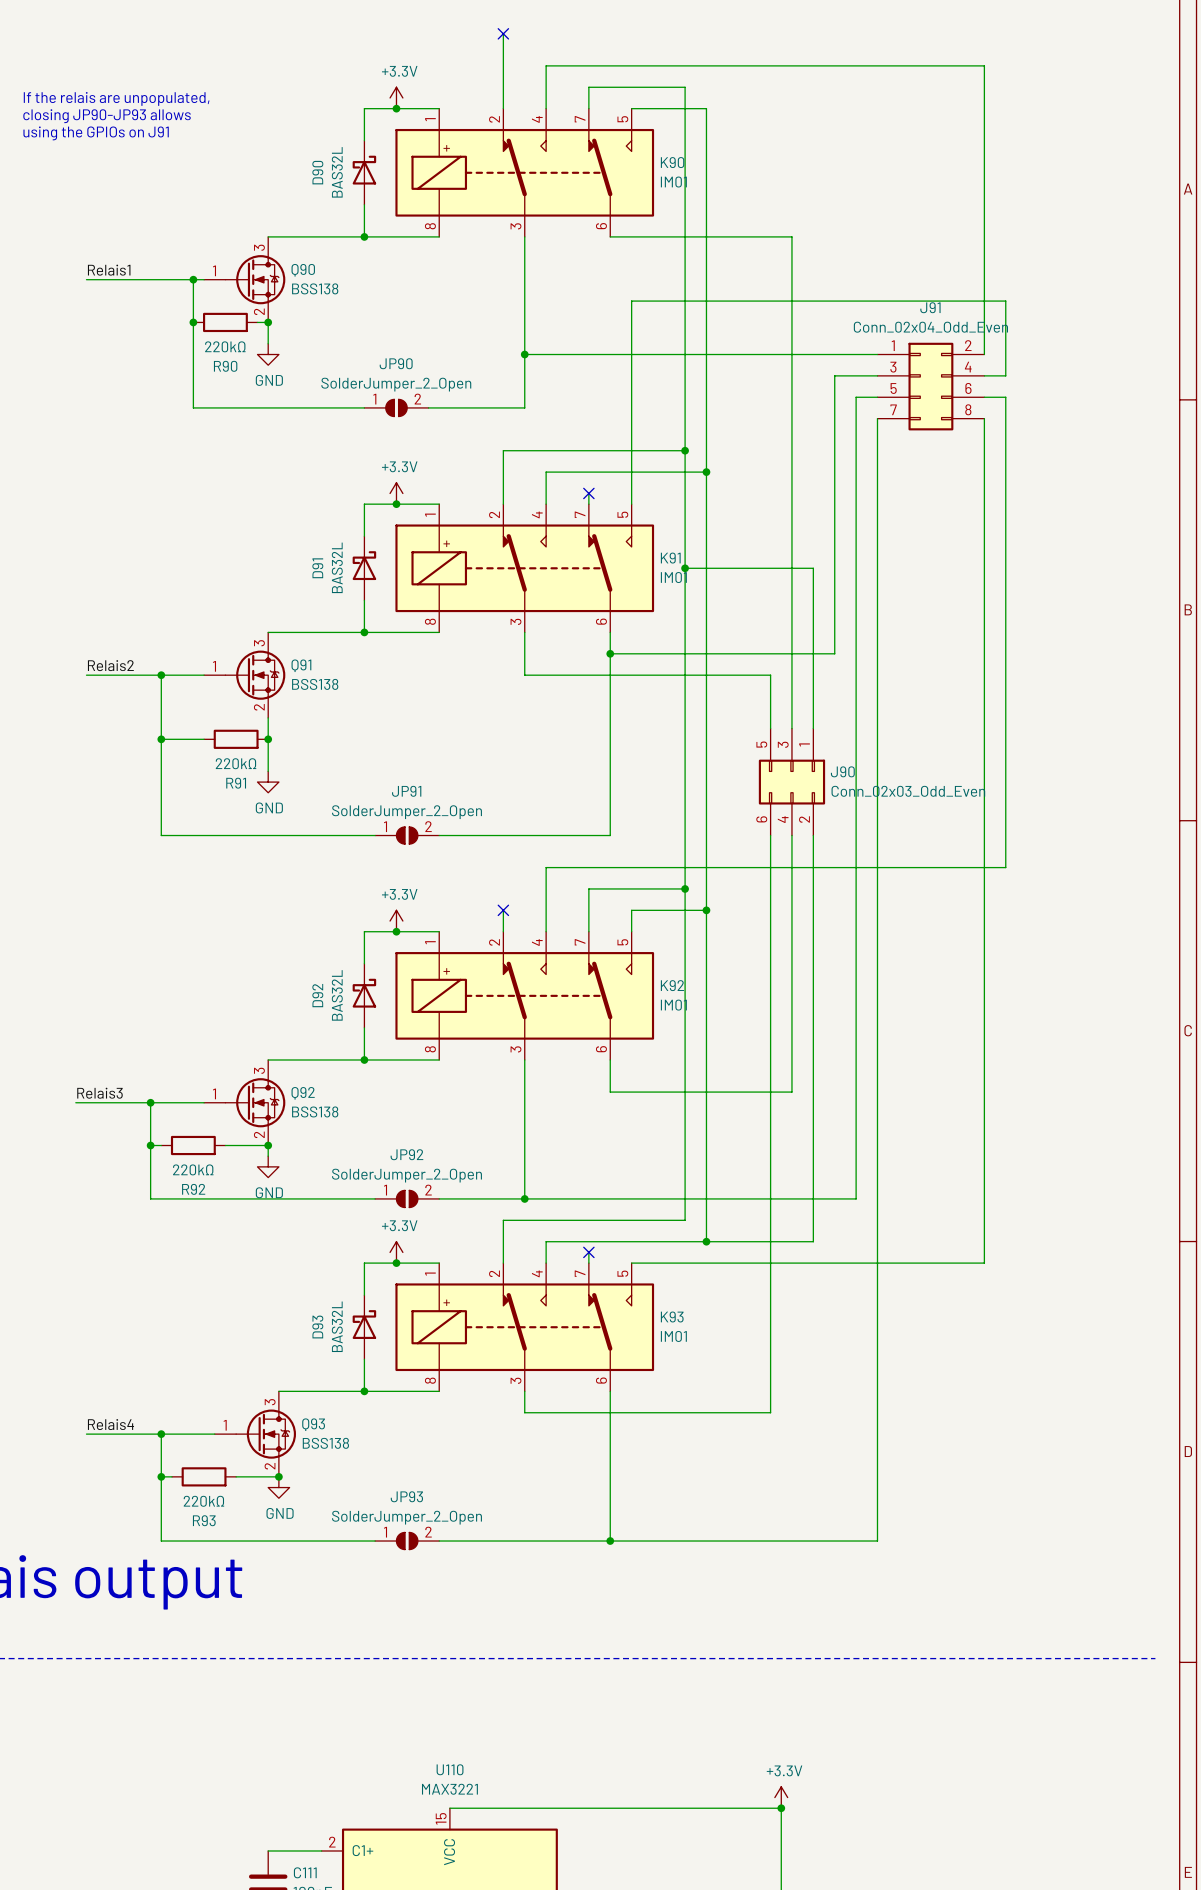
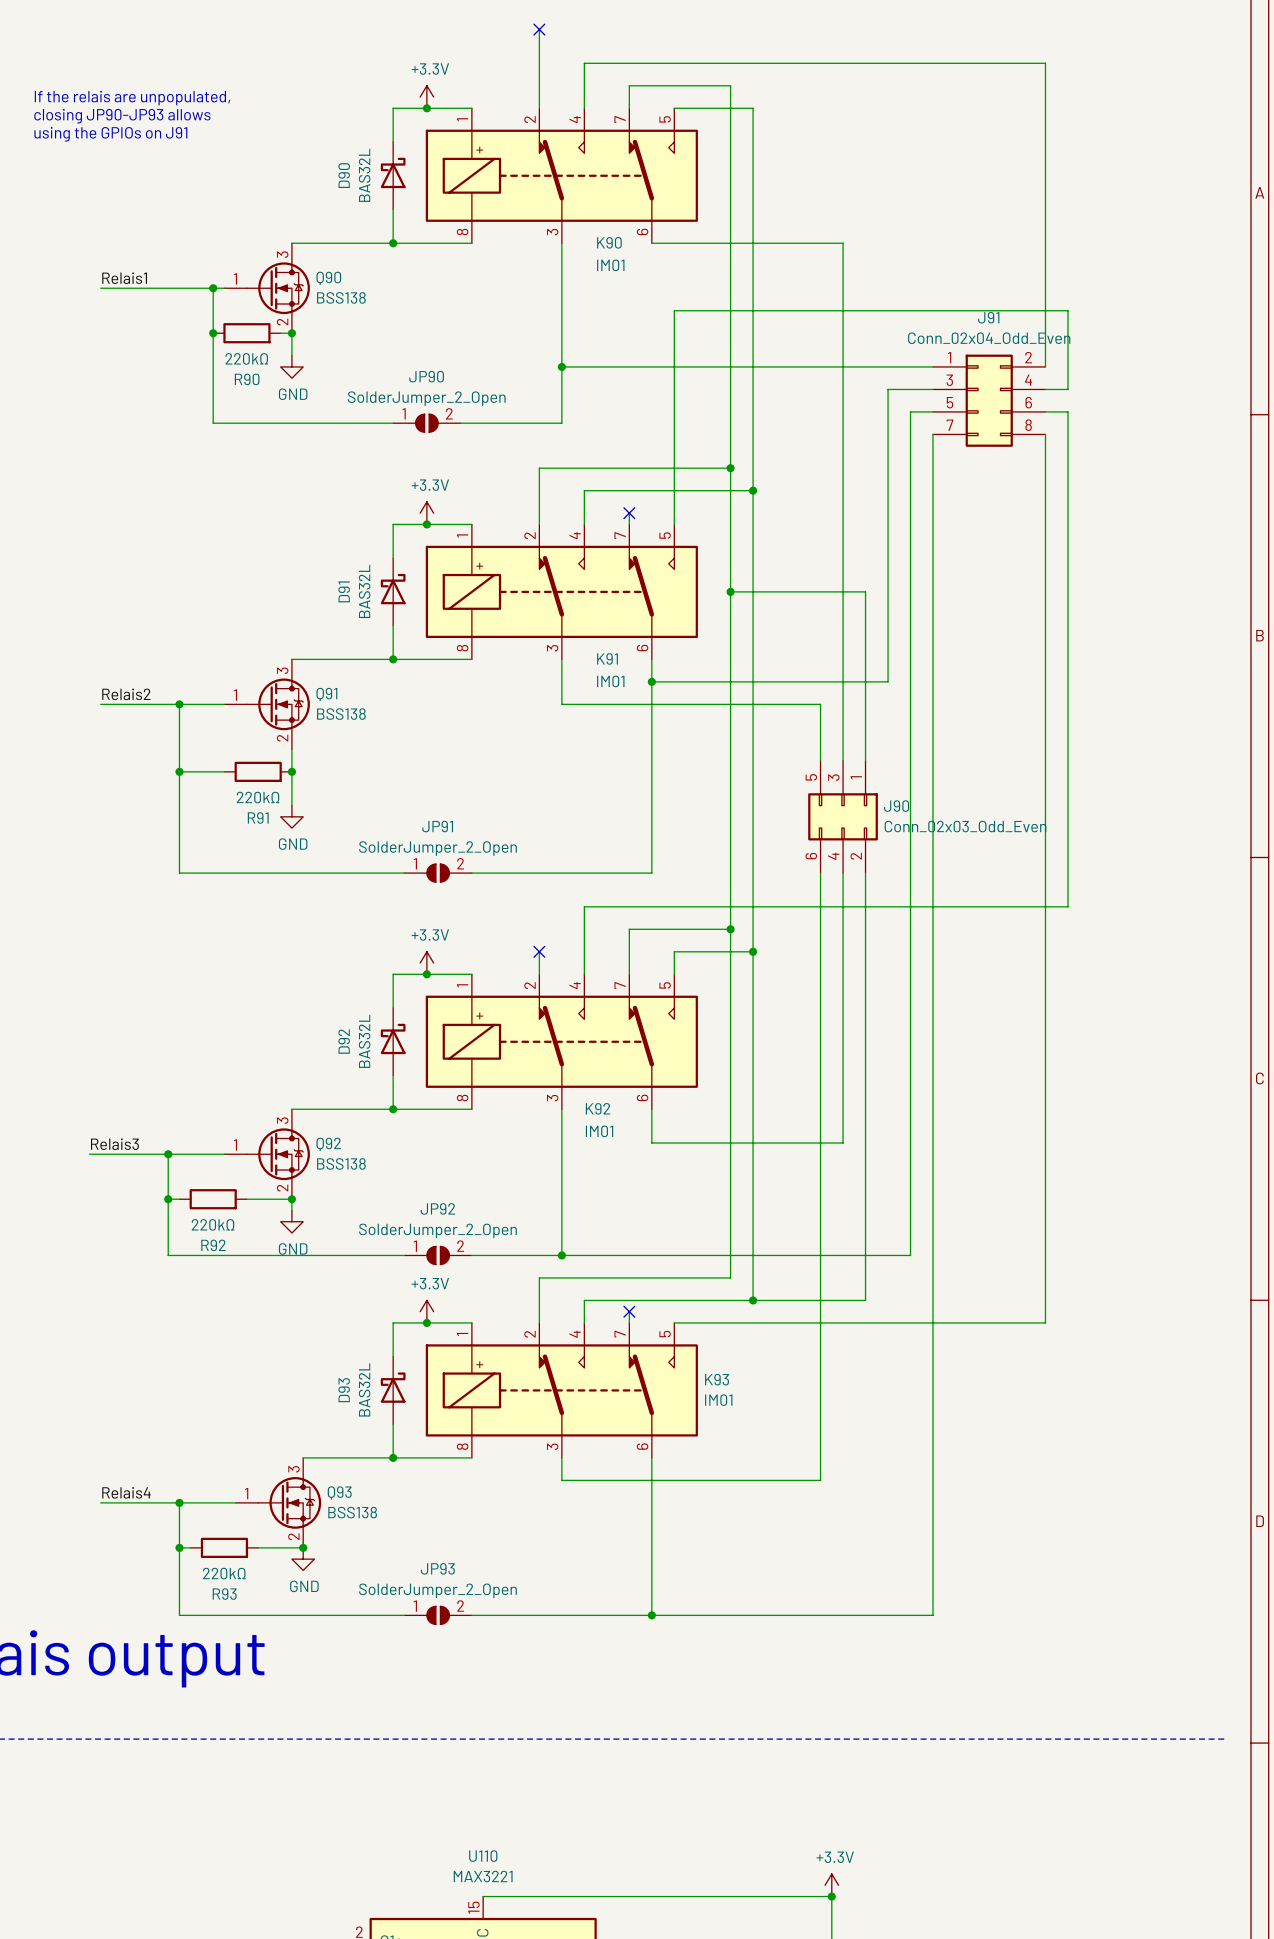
K90 name position: K90 (672, 162) -> K90 (609, 242)
K90 value position: IM01 (673, 182) -> IM01 (610, 265)
K91 name position: K91 (670, 558) -> K91 (607, 658)
K91 value position: IM01 (673, 577) -> IM01 (610, 681)
K92 name position: K92 (672, 985) -> K92 (598, 1108)
K92 value position: IM01 (673, 1005) -> IM01 (599, 1131)

